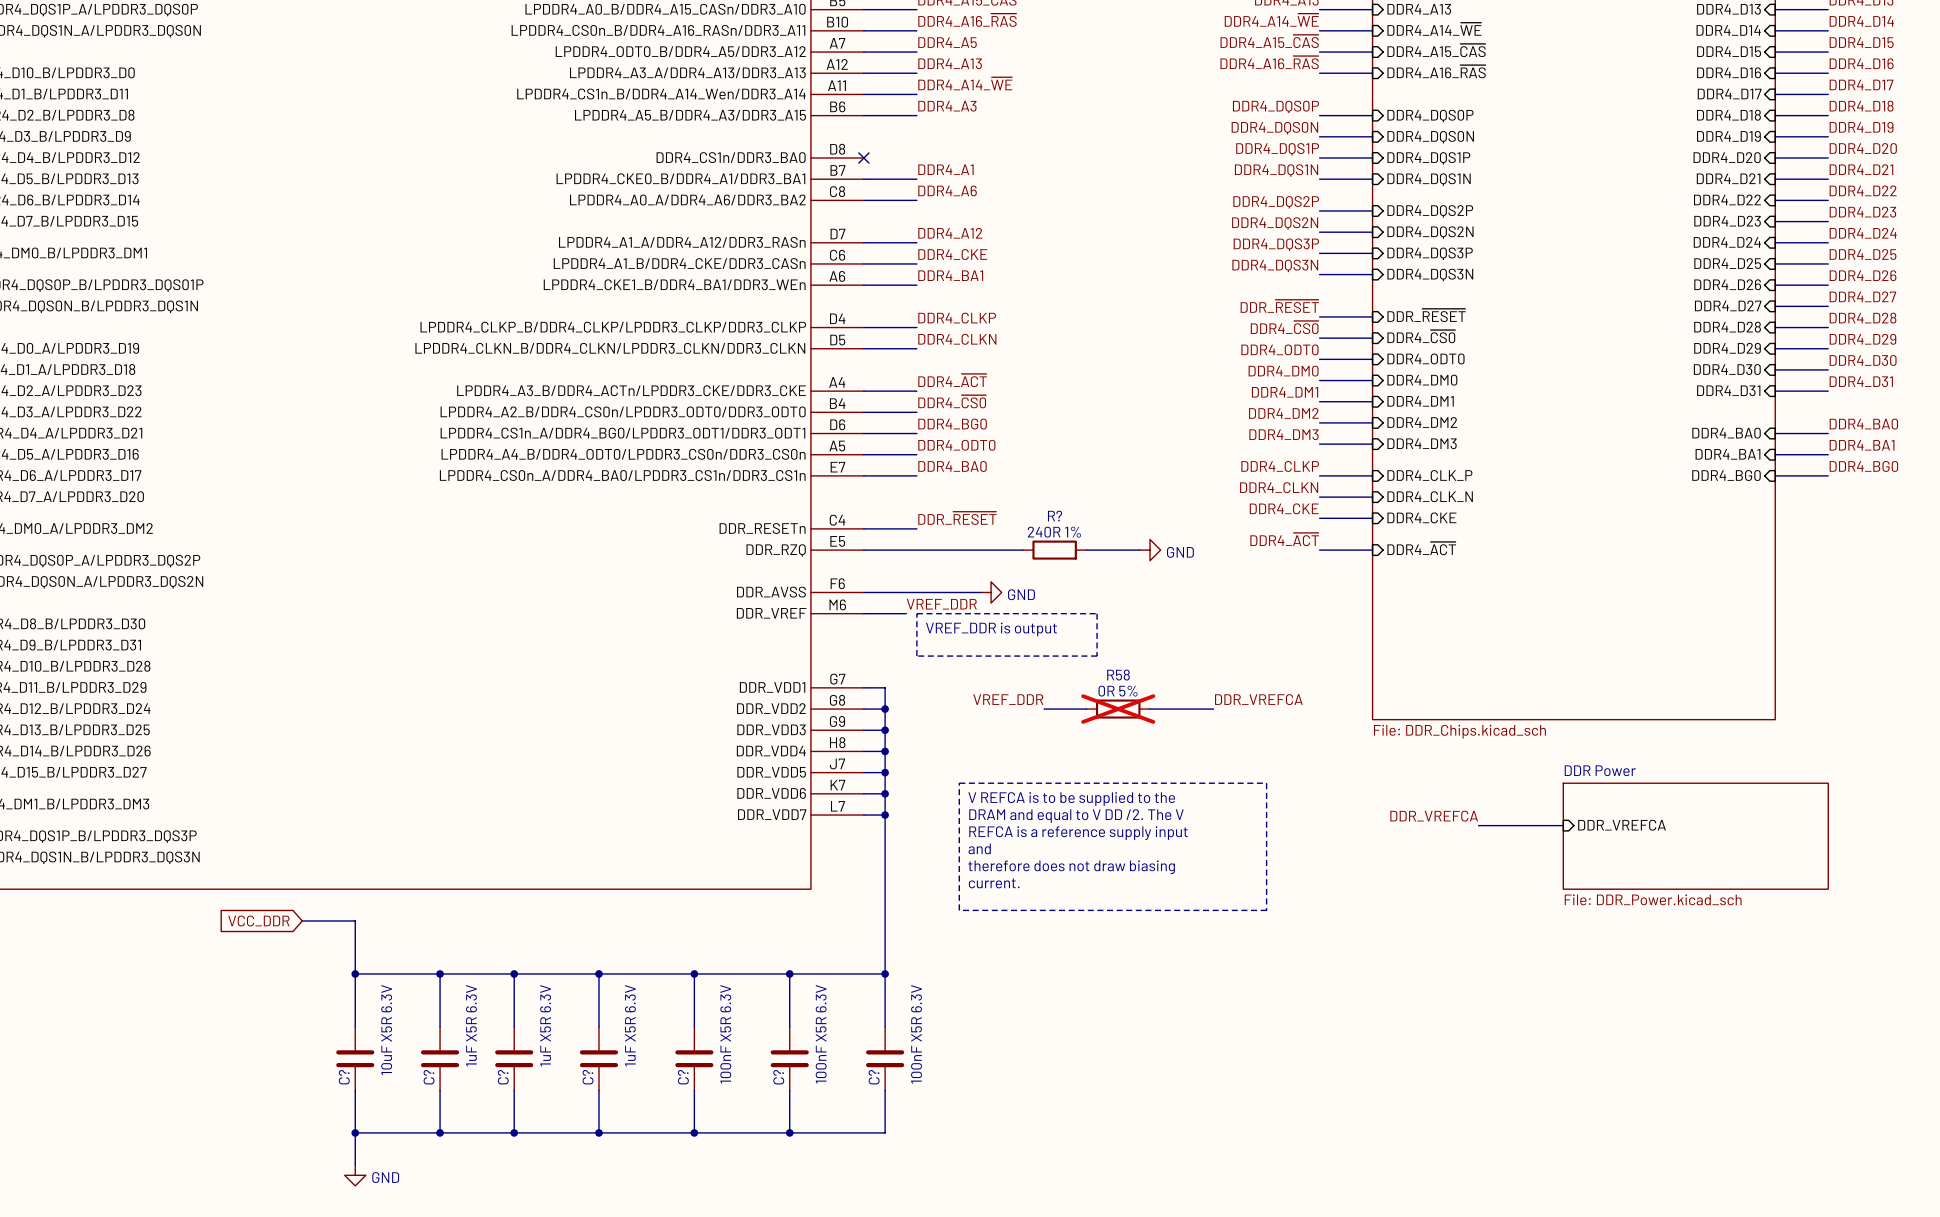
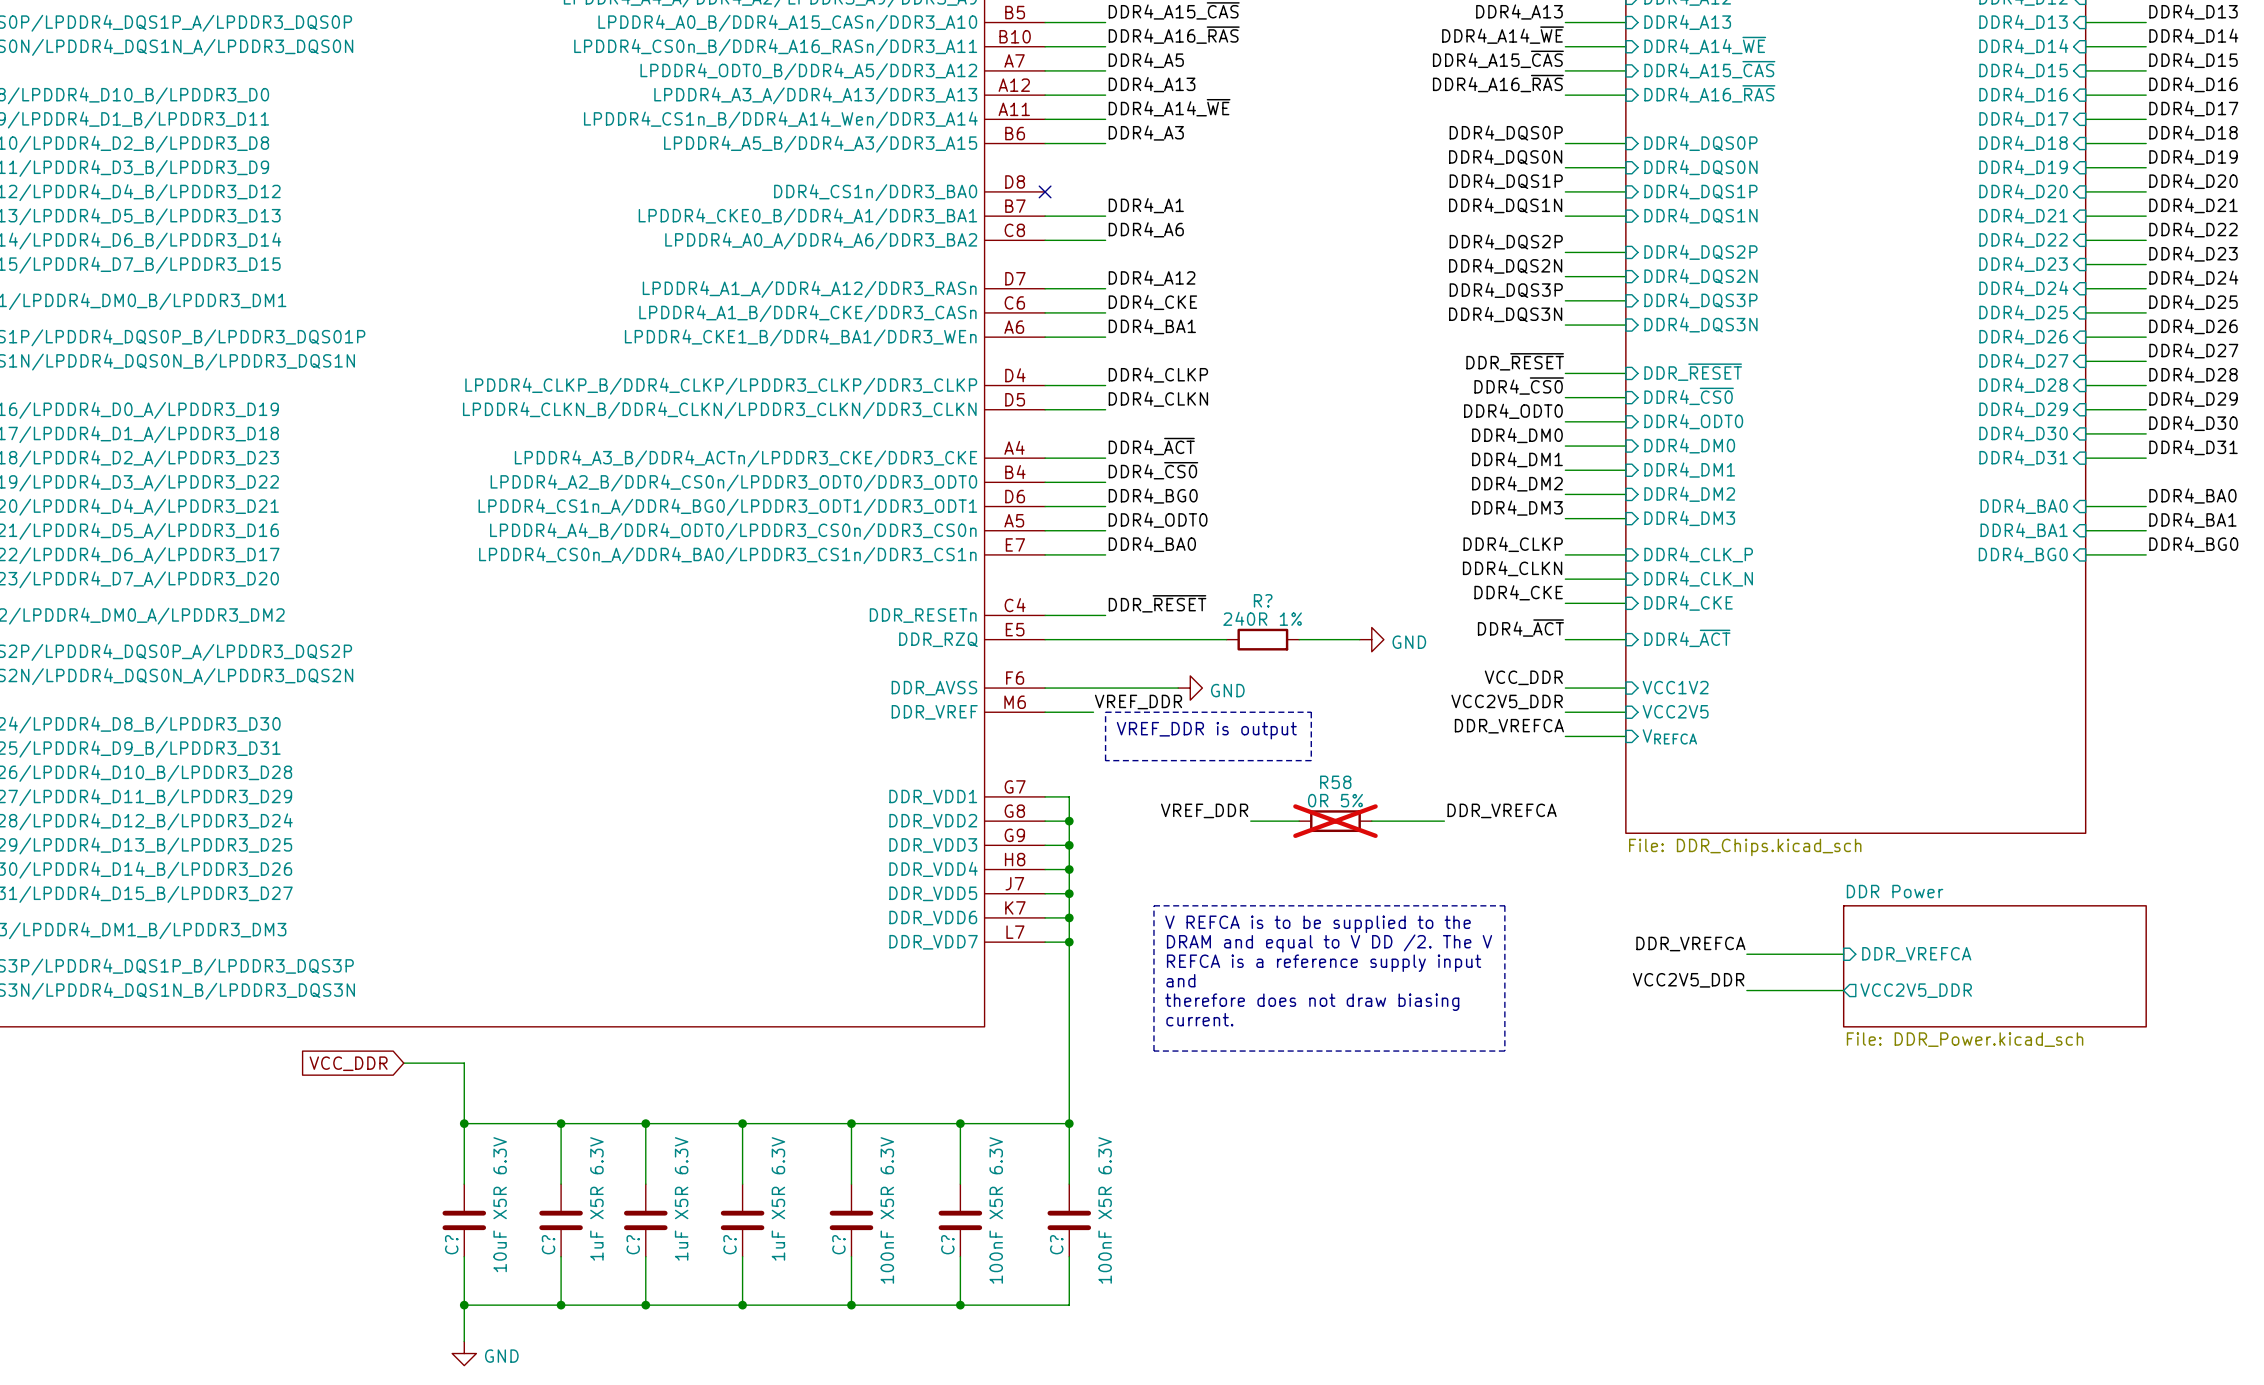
label: none -> VCC_DDR (1523, 677)
wire: none -> (1565, 688) (1625, 688)
sheet pin: none -> VCC1V2 (1675, 687)
label: none -> VCC2V5_DDR (1507, 702)
wire: none -> (1565, 712) (1625, 712)
sheet pin: none -> VCC2V5 (1675, 711)
label: none -> DDR_VREFCA (1509, 726)
wire: none -> (1565, 736) (1625, 736)
sheet pin: none -> VREFCA (1669, 736)
label: none -> VCC2V5_DDR (1688, 980)
wire: none -> (1746, 990) (1843, 990)
sheet pin: none -> VCC2V5_DDR (1916, 990)

